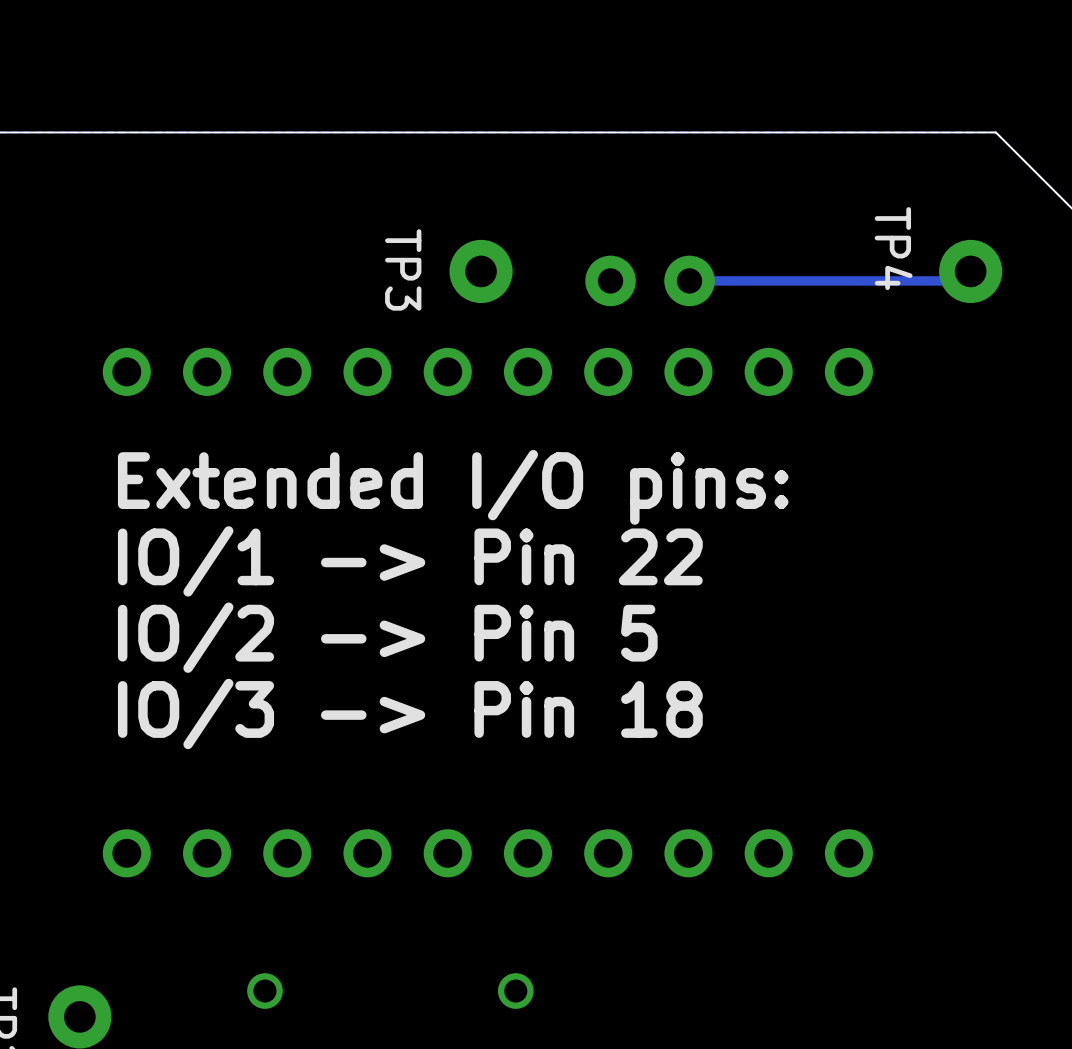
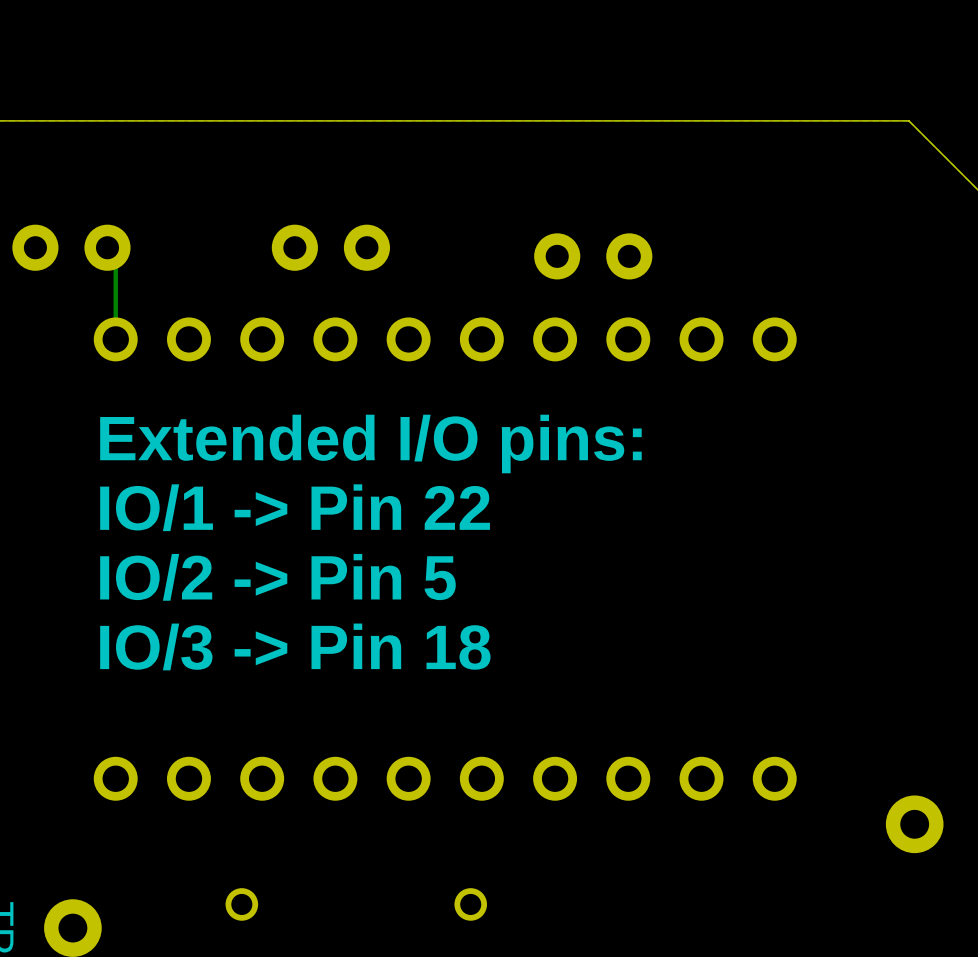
part: none -> (71, 247)
part: none -> (330, 247)
TP3: (481, 271) -> none
TP4: (970, 271) -> none
track: none -> (115, 255) (115, 339)
track: (961, 280) (689, 280) -> none
part: none -> (914, 824)

